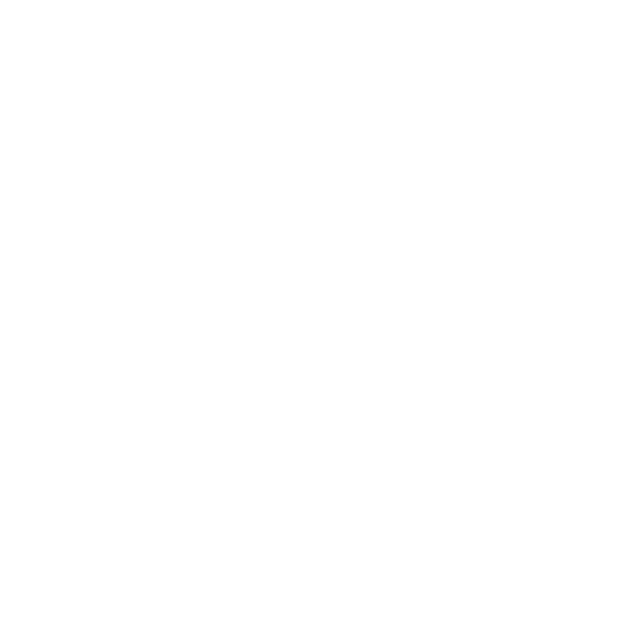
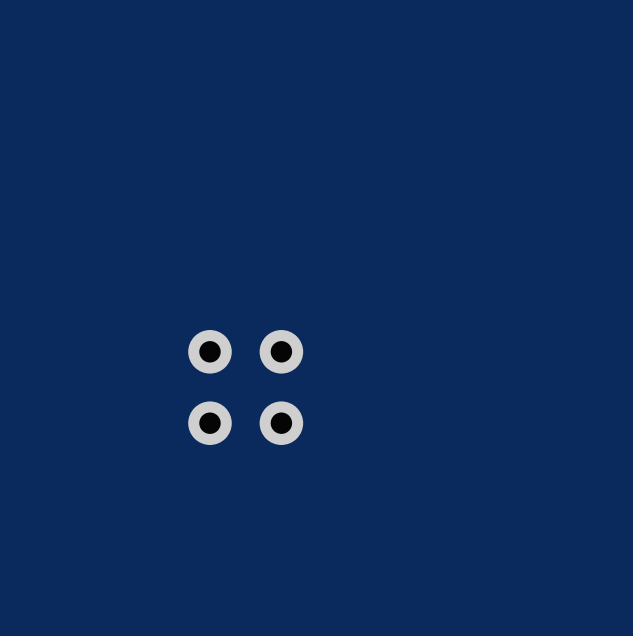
part: none -> (245, 387)

